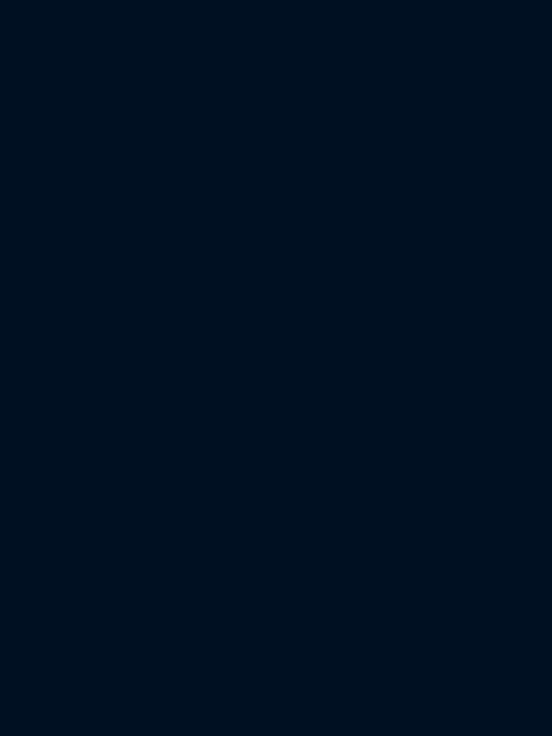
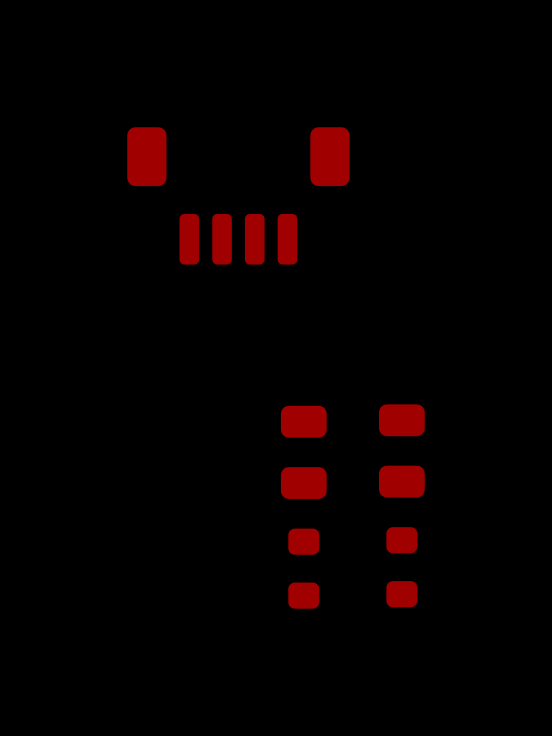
part: none -> (238, 195)
part: none -> (401, 450)
part: none -> (303, 452)
part: none -> (401, 567)
part: none -> (303, 568)

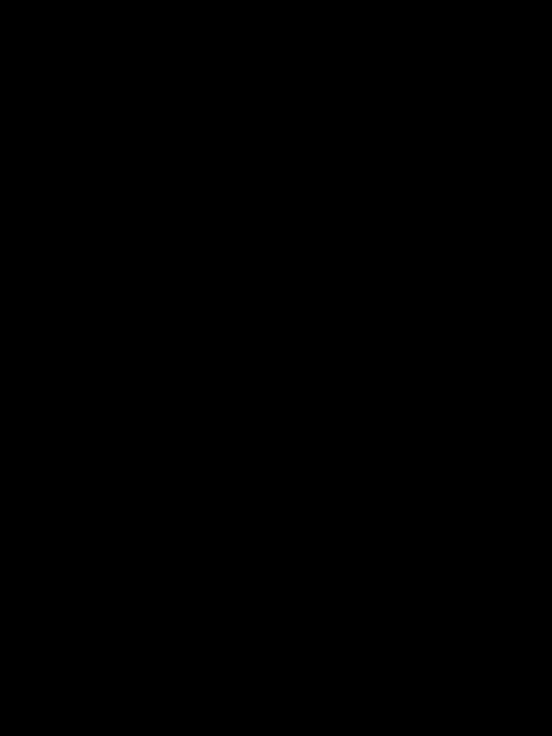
part: (238, 195) -> none
part: (401, 450) -> none
part: (303, 452) -> none
part: (401, 567) -> none
part: (303, 568) -> none

